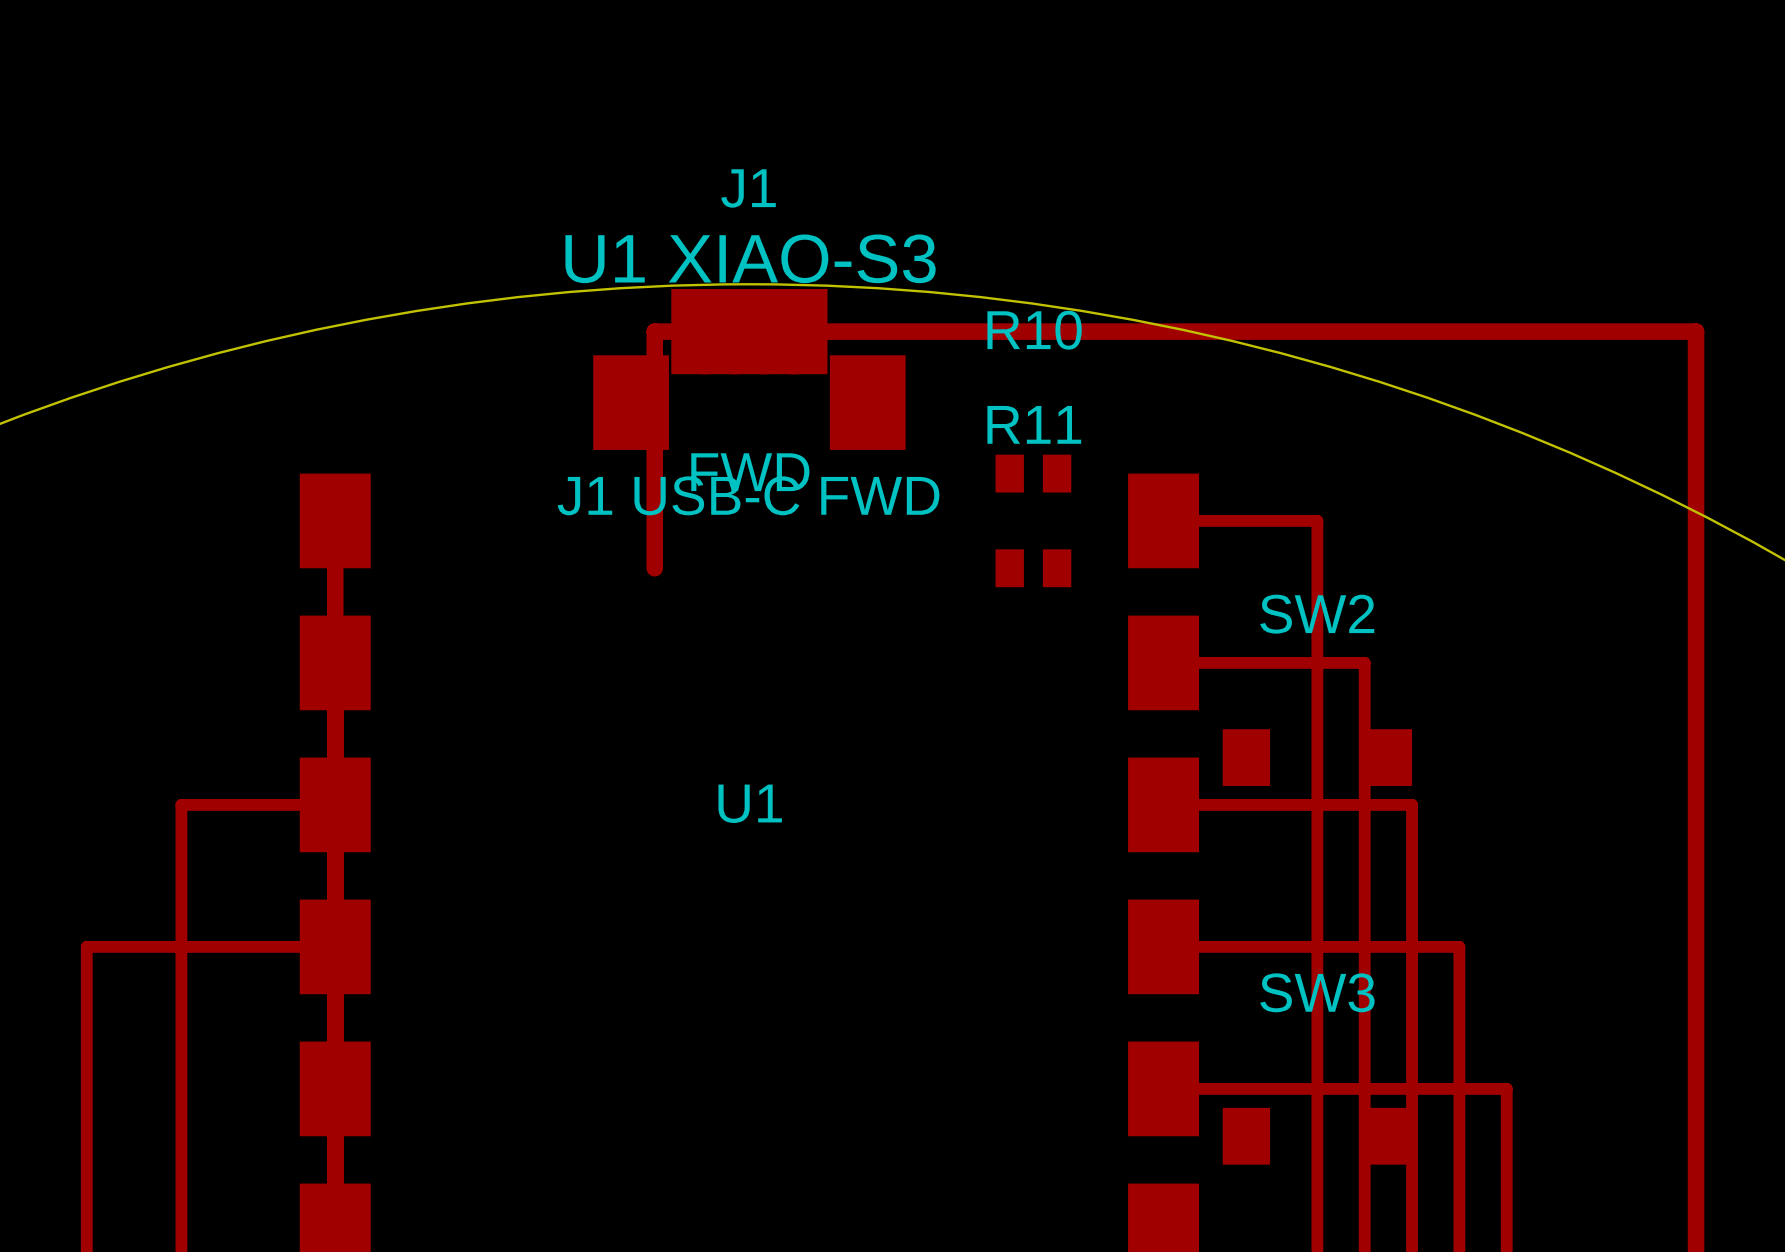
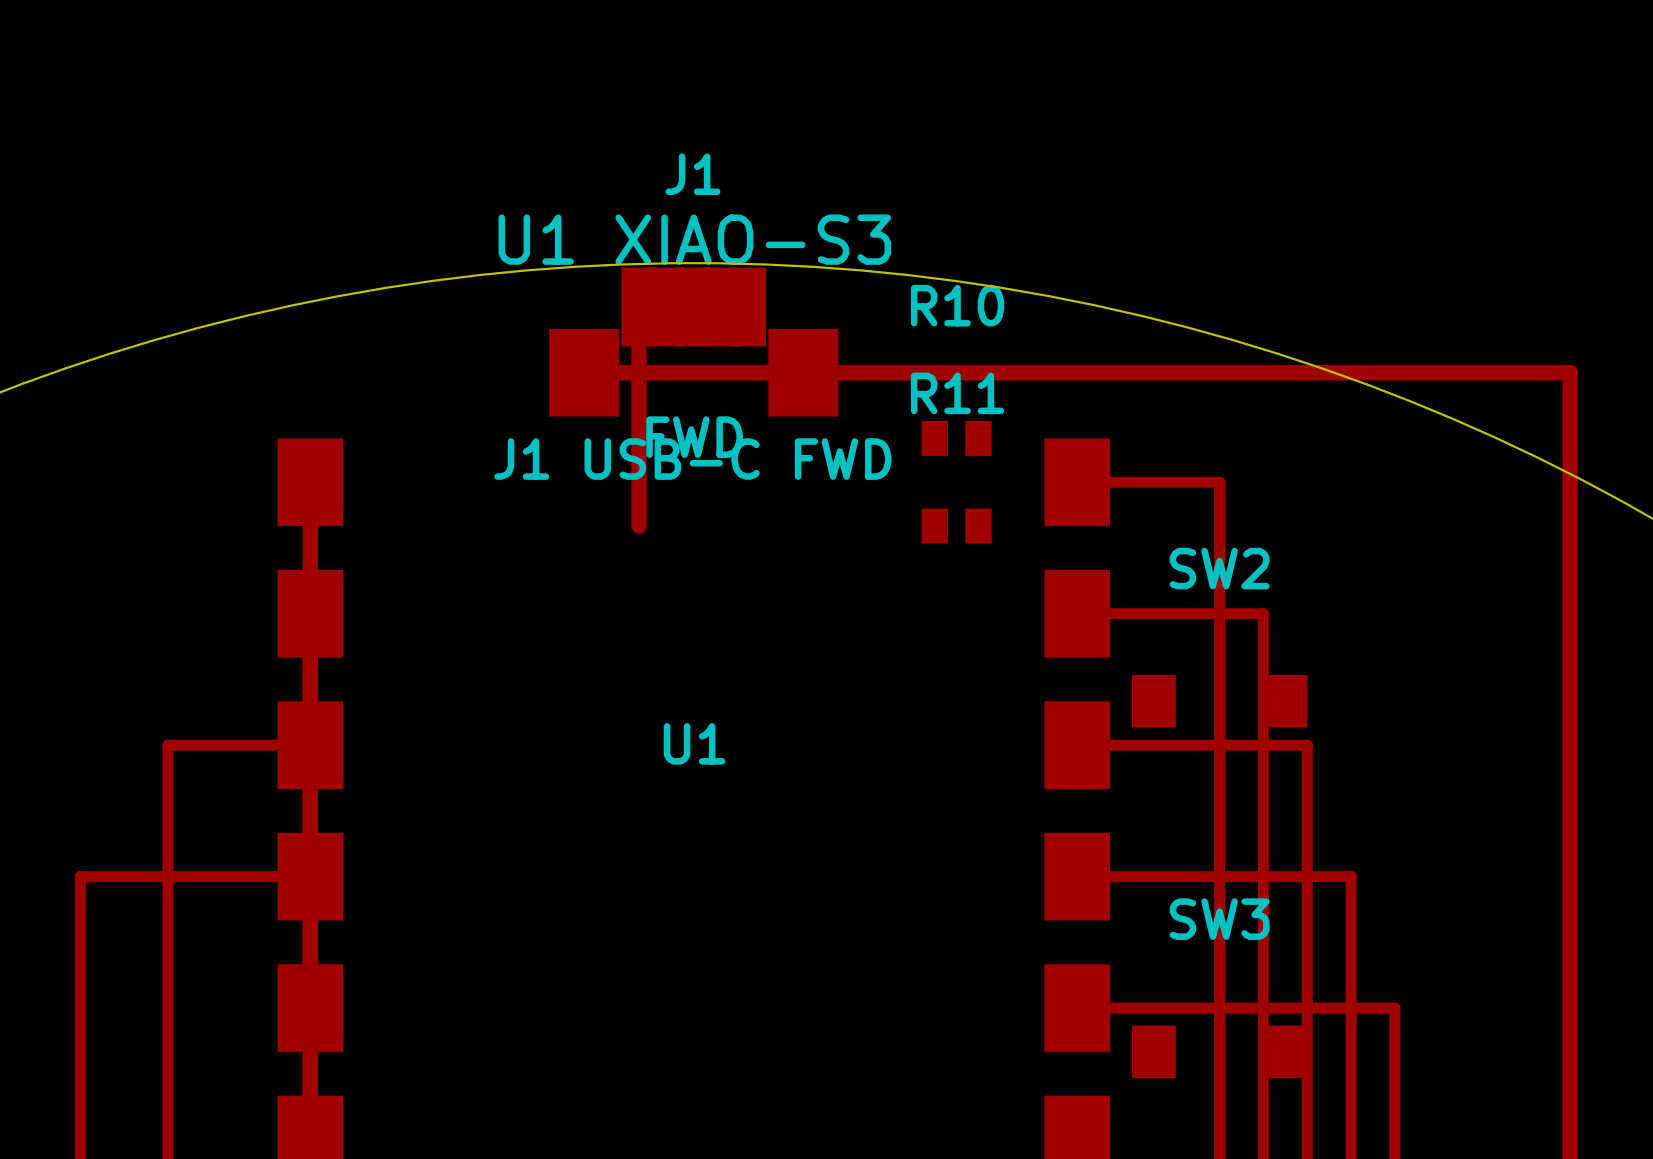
track: (690, 331) (654, 331) (654, 568) -> (639, 306) (639, 526)
track: (778, 331) (1696, 331) (1696, 402) -> (584, 372) (1570, 372)

